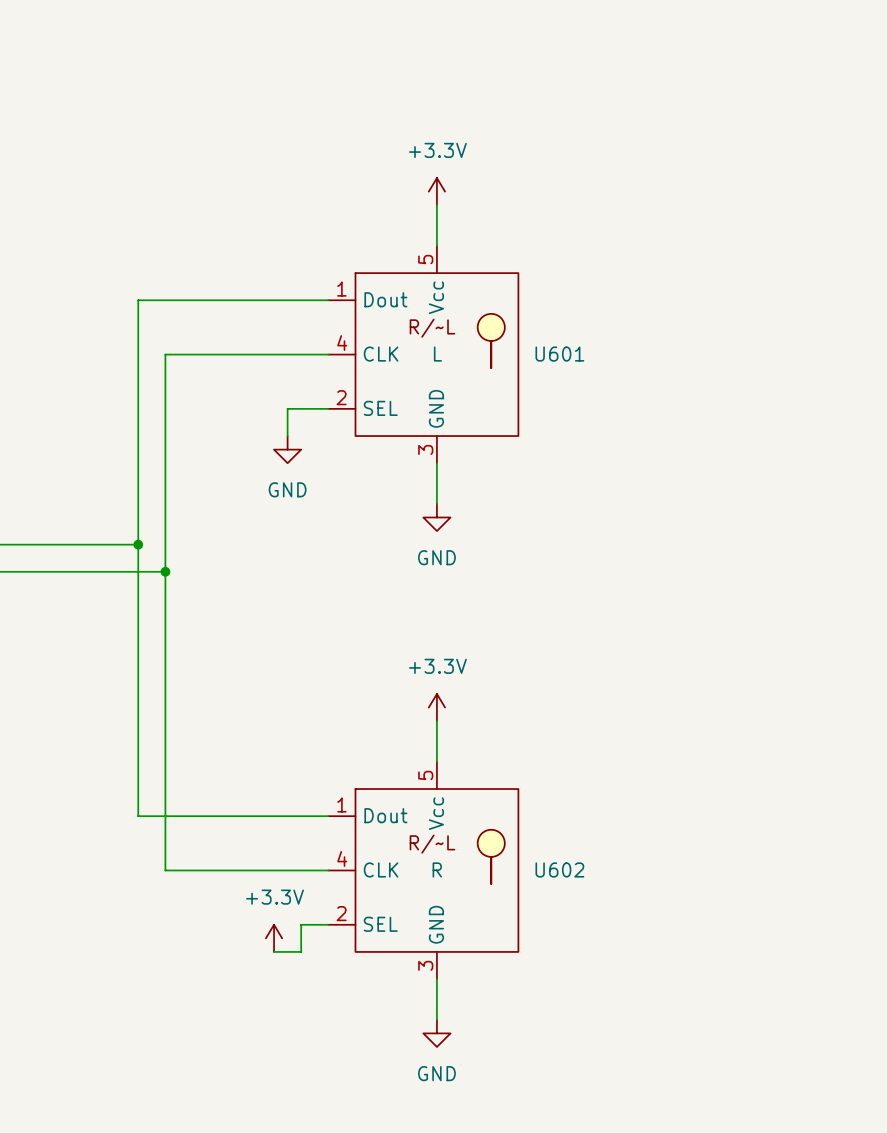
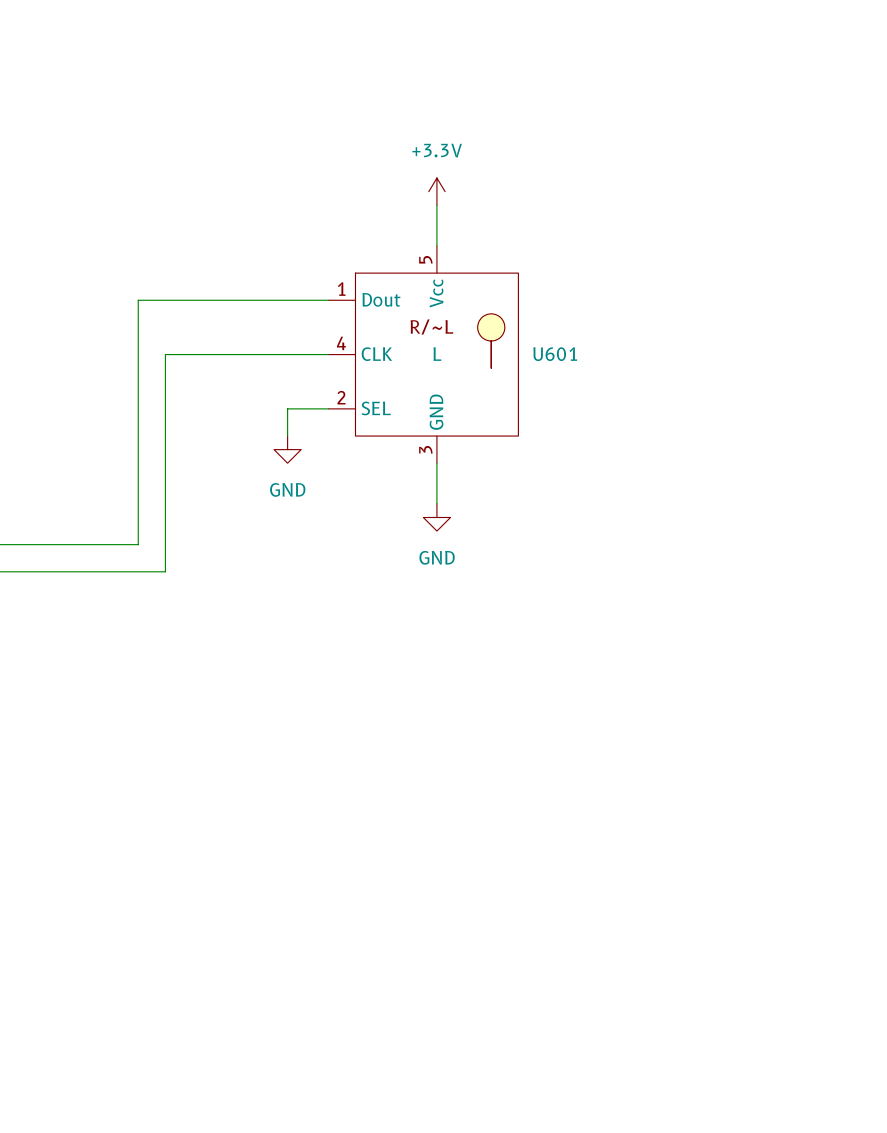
wire: (138, 544) (138, 816) (328, 816) -> none
junction: (138, 544) -> none
wire: (165, 571) (165, 870) (328, 870) -> none
junction: (165, 571) -> none
power symbol: +3.3V (436, 707) -> none
wire: (436, 721) (436, 761) -> none
U602: R (423, 870) -> none
wire: (328, 924) (301, 924) (301, 951) (274, 951) -> none
power symbol: +3.3V (274, 938) -> none
wire: (436, 979) (436, 1019) -> none
power symbol: GND (436, 1033) -> none

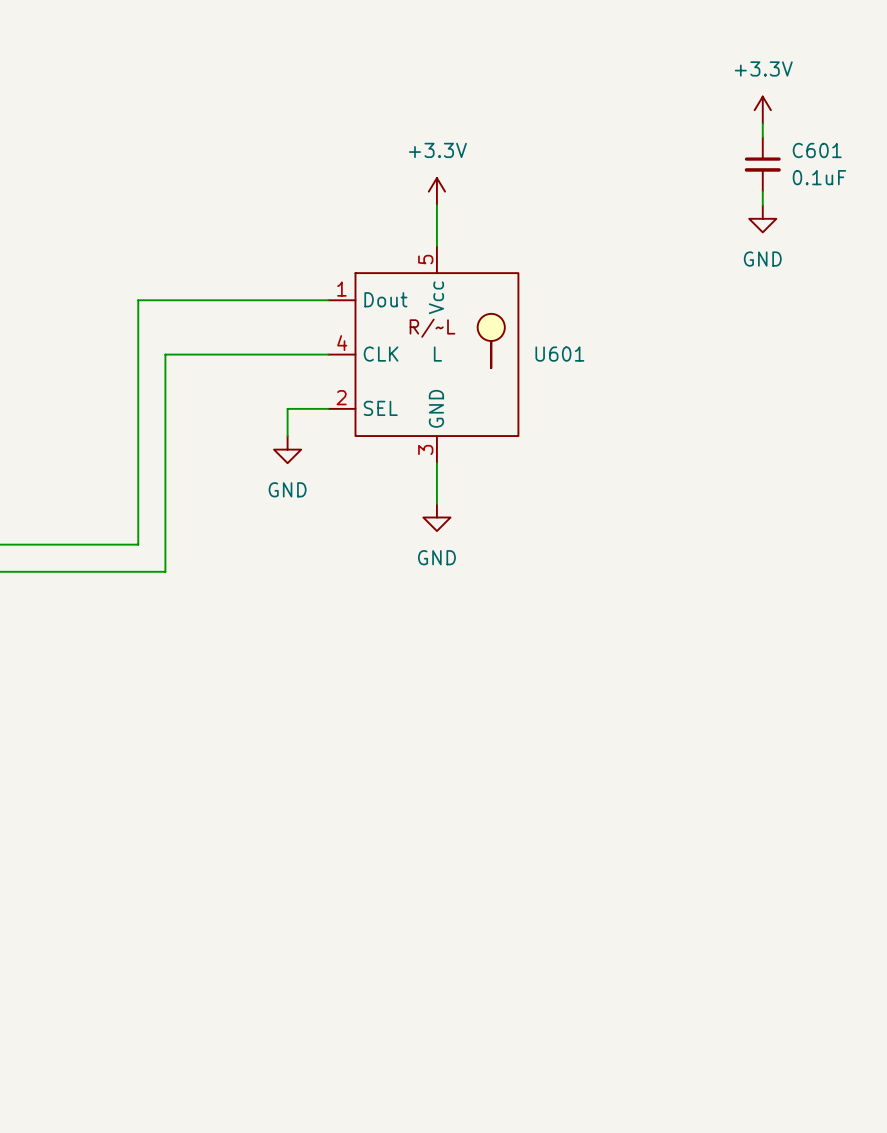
power symbol: none -> +3.3V (762, 110)
wire: none -> (762, 123) (762, 137)
C601: none -> 0.1uF (762, 164)
wire: none -> (762, 191) (762, 205)
power symbol: none -> GND (762, 218)

